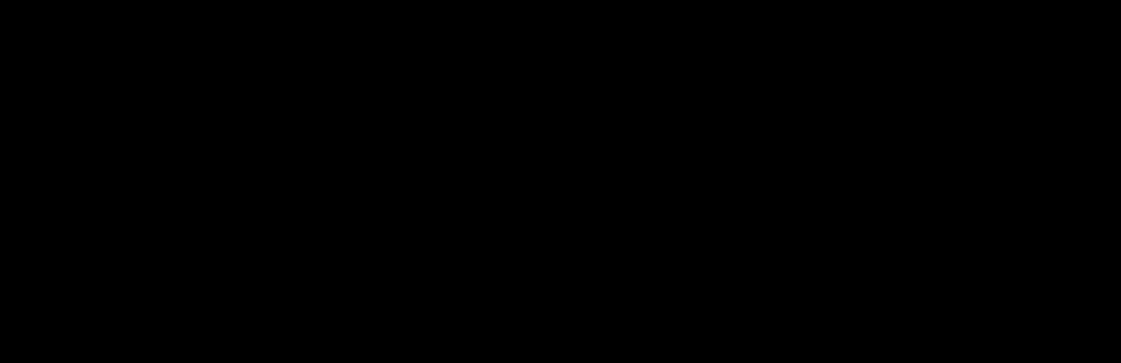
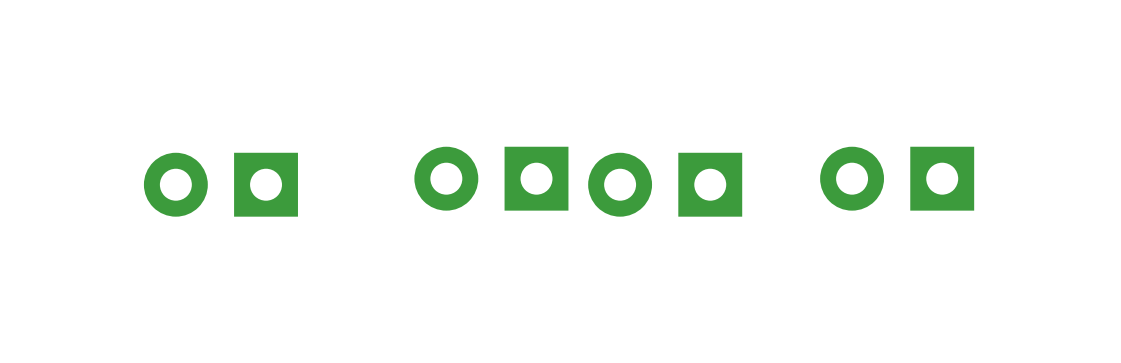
part: none -> (491, 178)
part: none -> (897, 178)
part: none -> (220, 184)
part: none -> (665, 184)

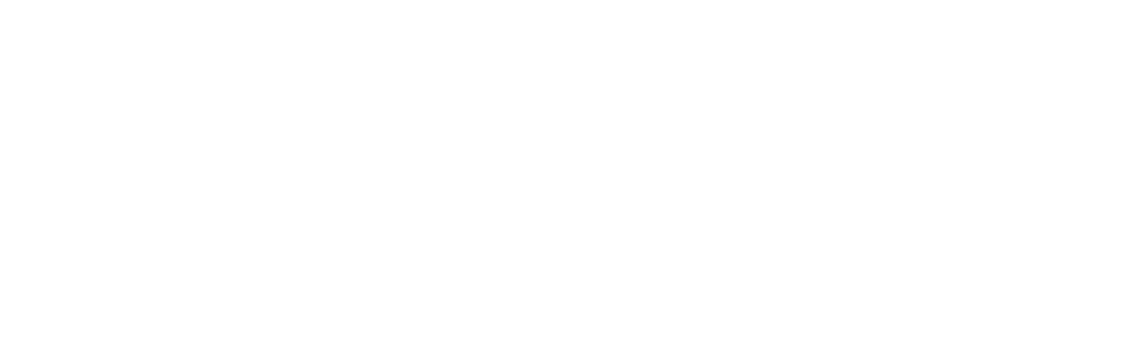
part: (491, 178) -> none
part: (897, 178) -> none
part: (220, 184) -> none
part: (665, 184) -> none

